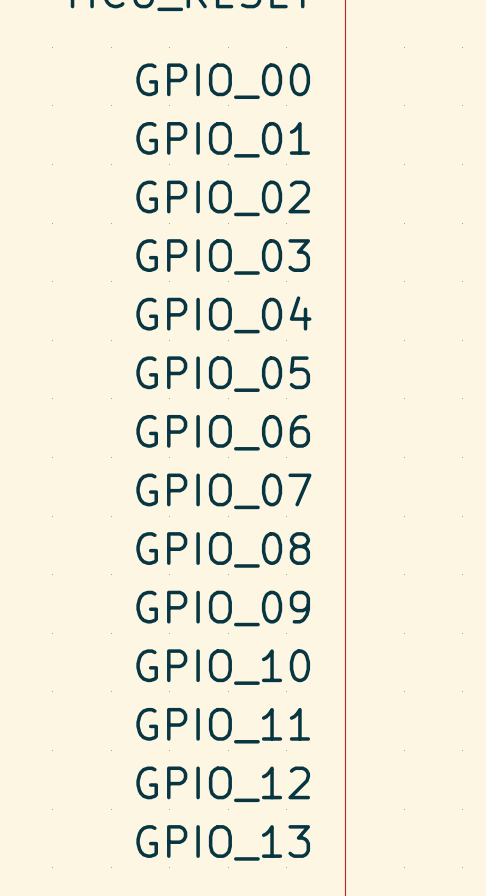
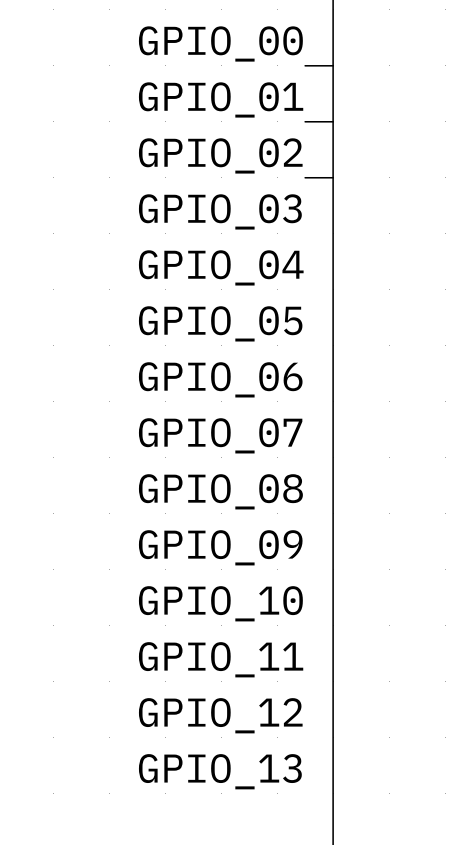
wire: none -> (305, 65) (333, 65)
wire: none -> (305, 121) (333, 121)
wire: none -> (305, 177) (333, 177)

